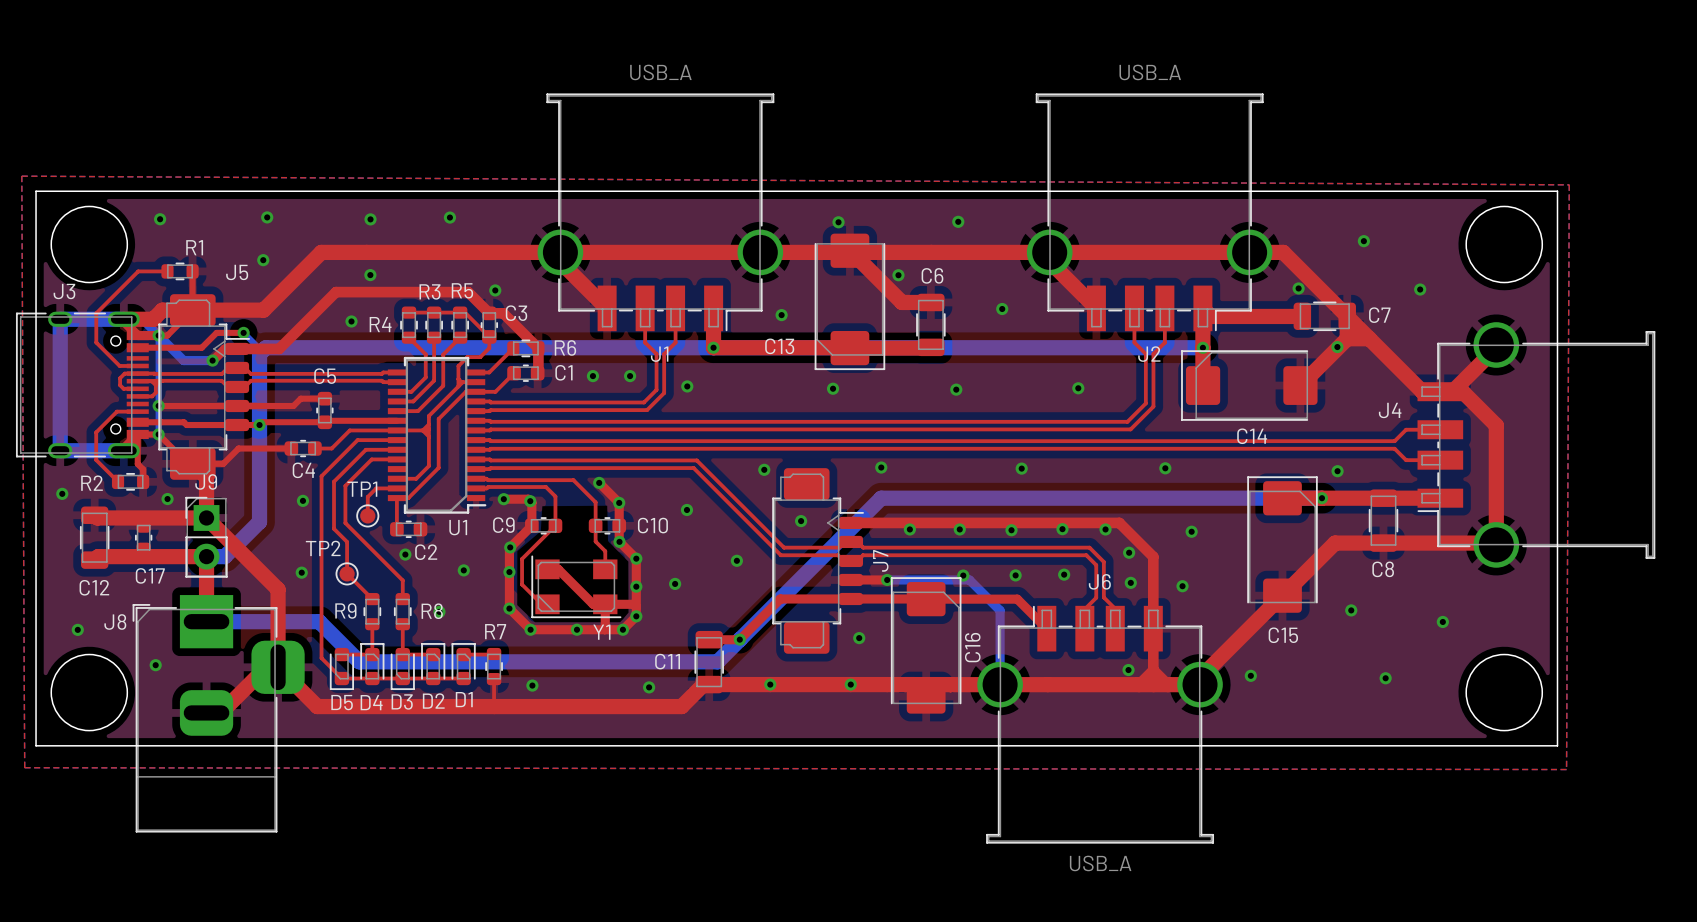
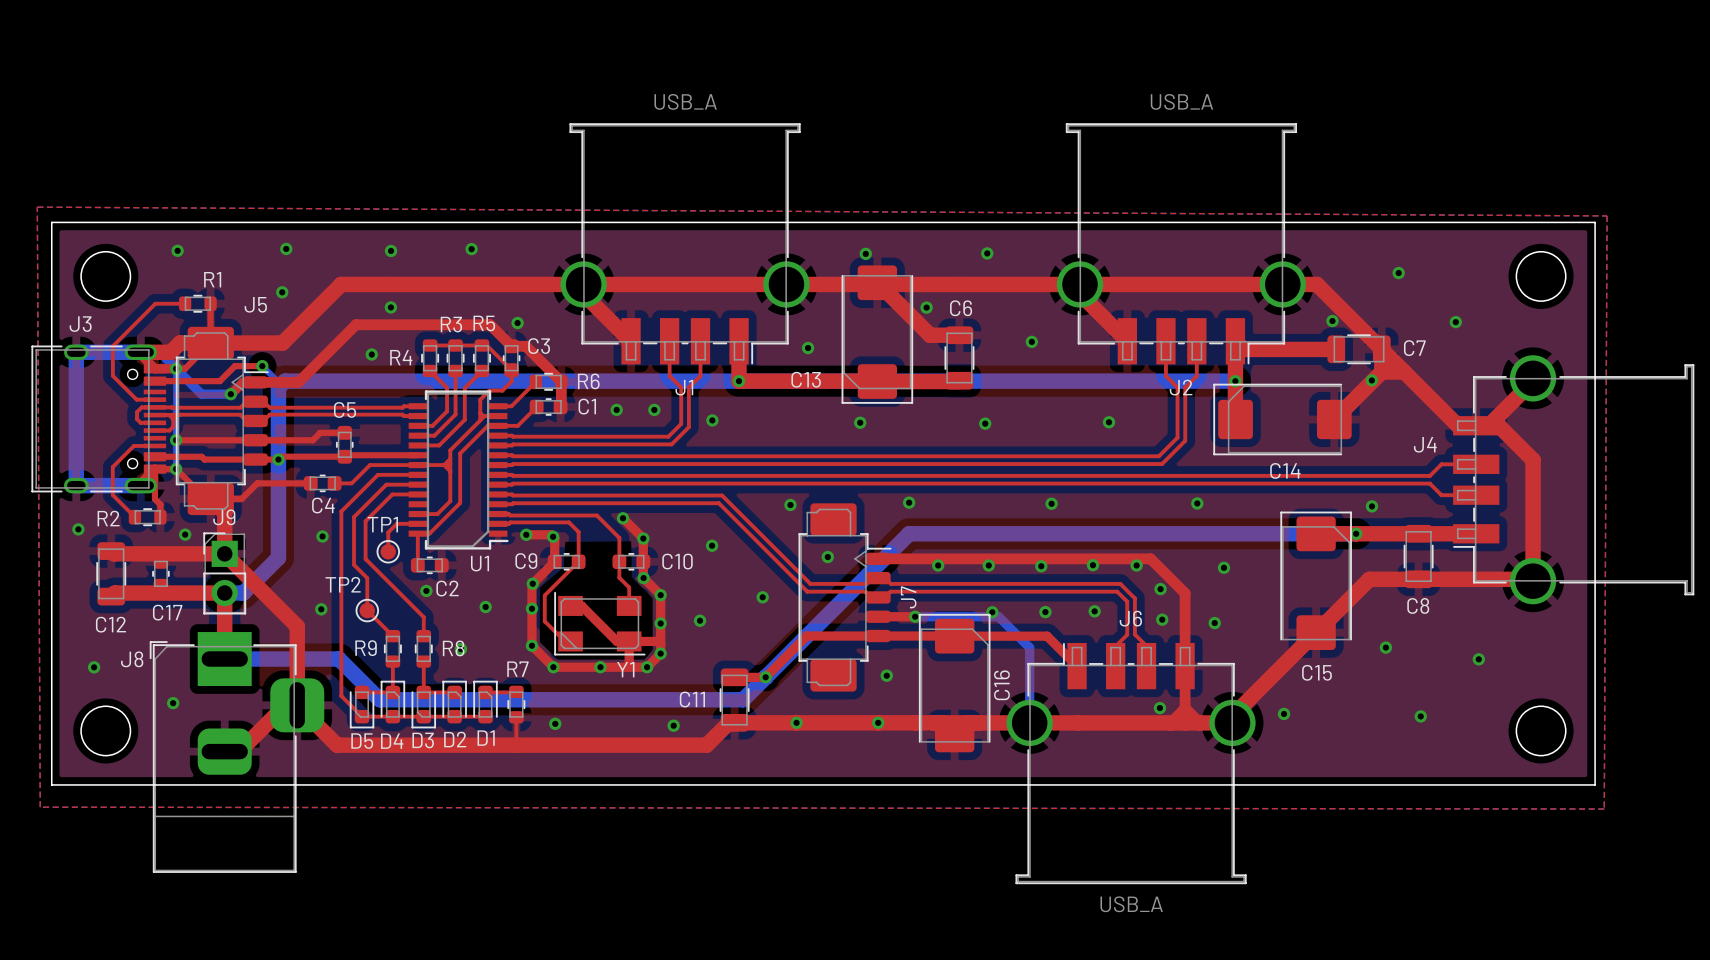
round board edge size: [50, 205, 129, 284] -> [80, 250, 132, 302]
round board edge size: [1465, 205, 1544, 284] -> [1515, 250, 1567, 302]
round board edge size: [50, 653, 129, 732] -> [80, 705, 132, 757]
round board edge size: [1465, 653, 1544, 732] -> [1515, 705, 1567, 757]

